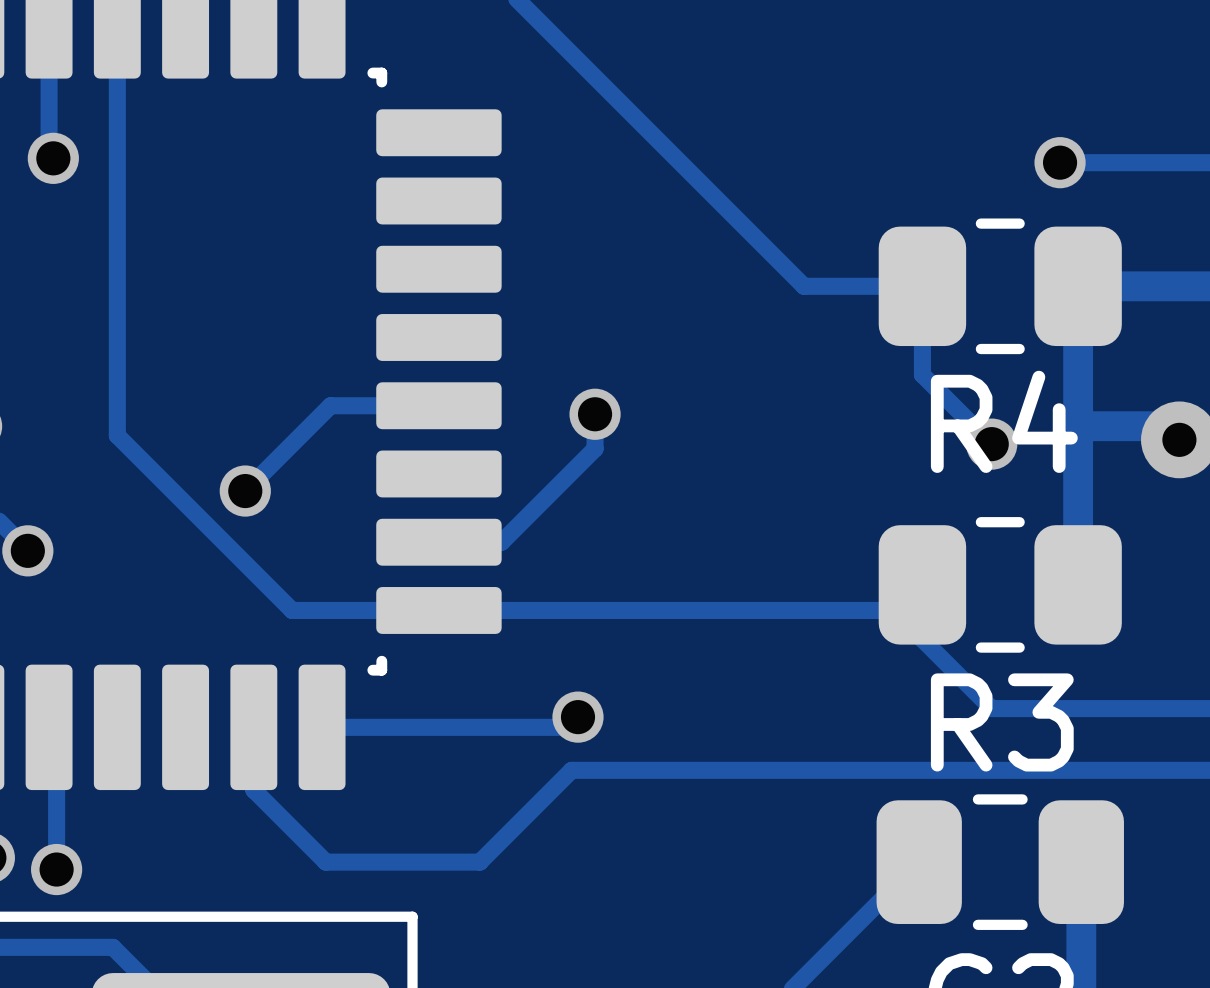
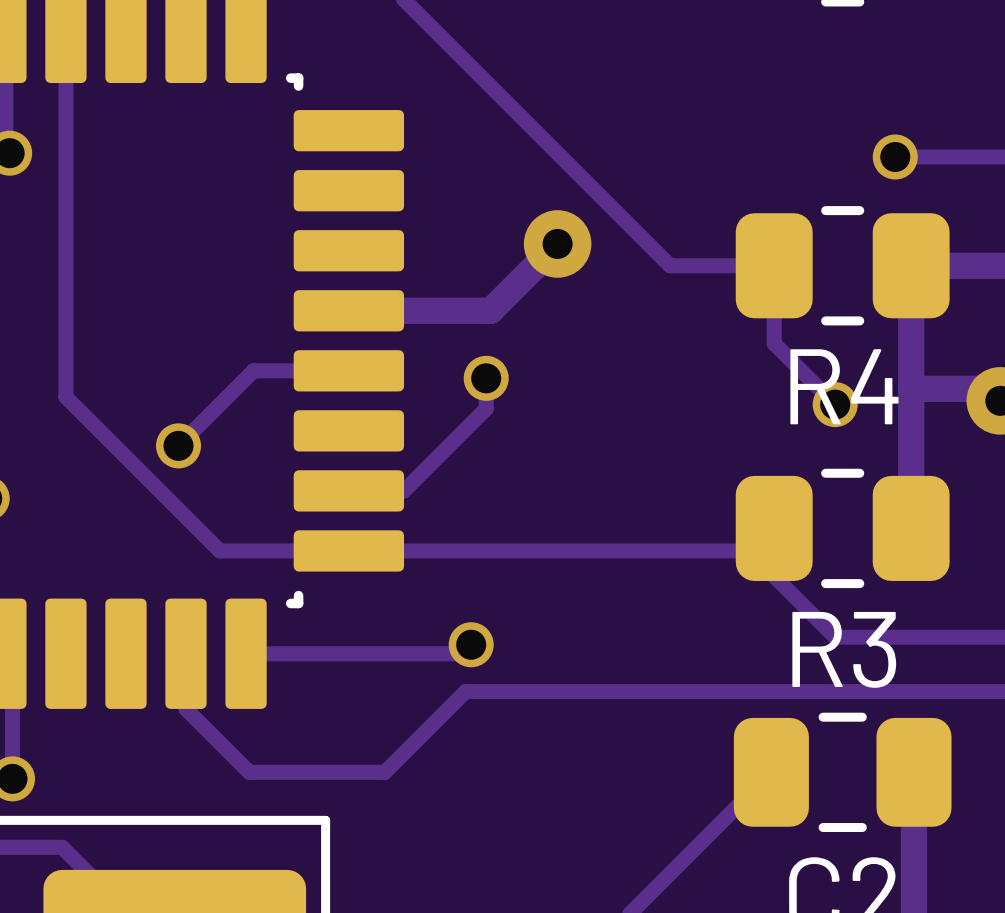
track: none -> (557, 243) (490, 310) (348, 310)
via: none -> (557, 243)

